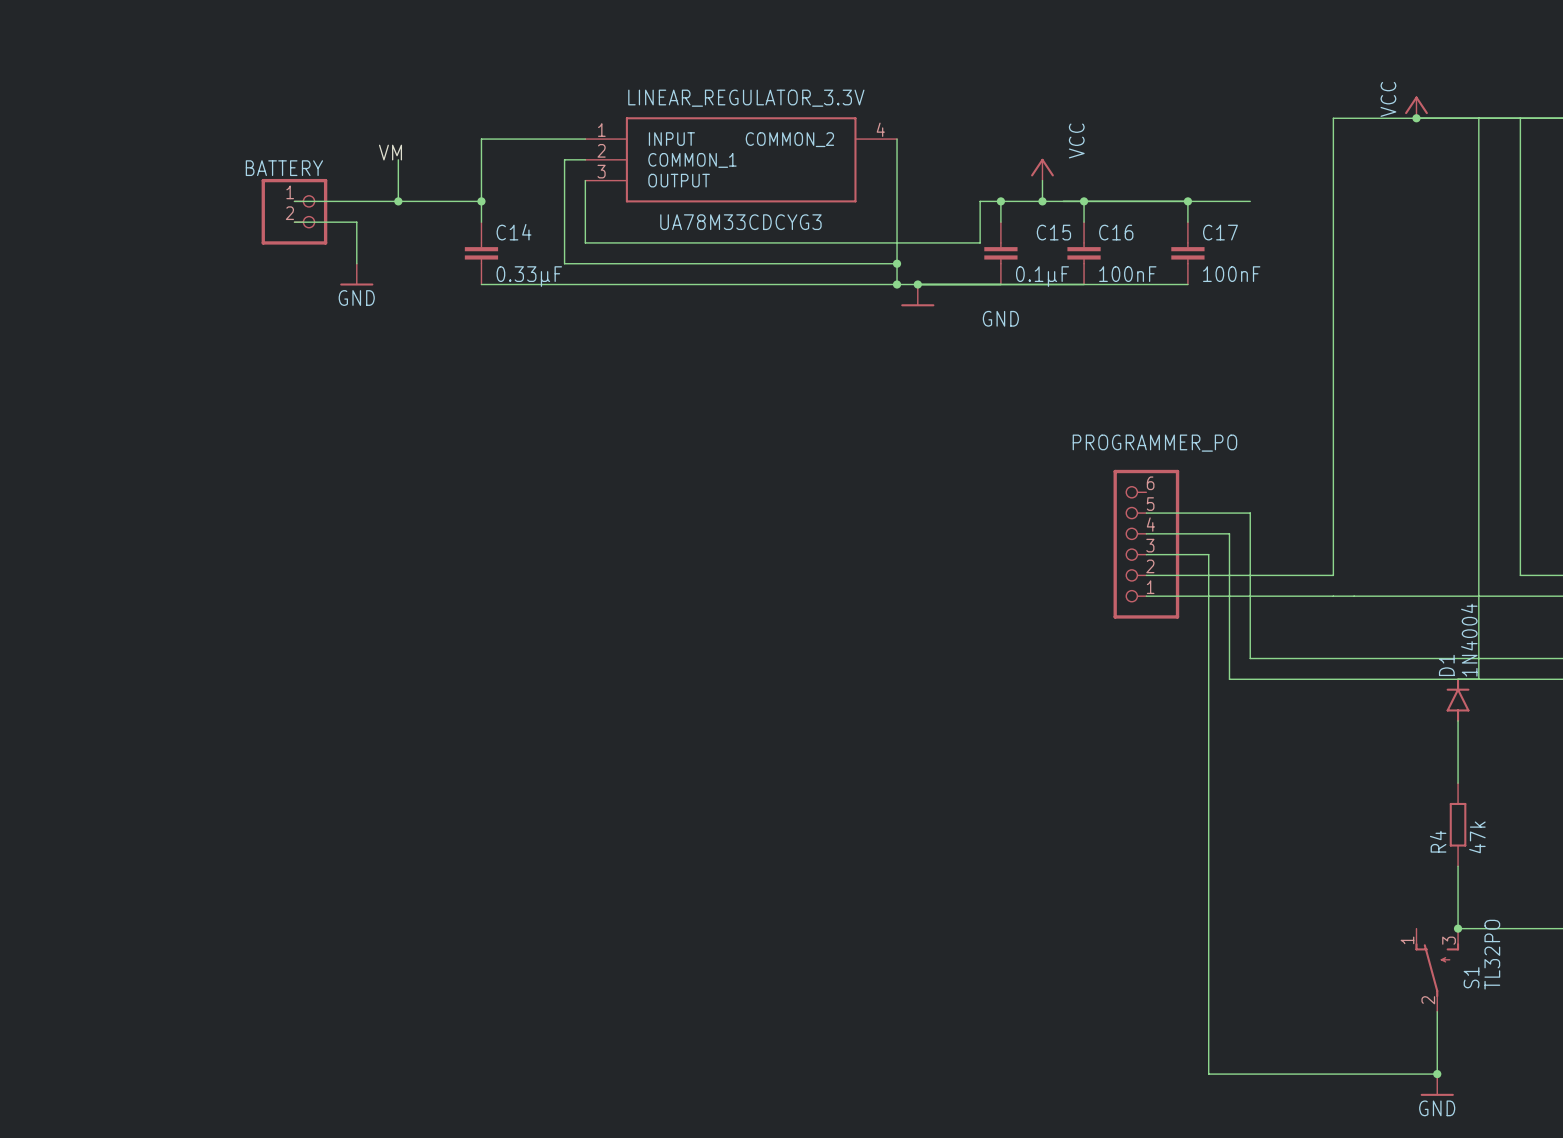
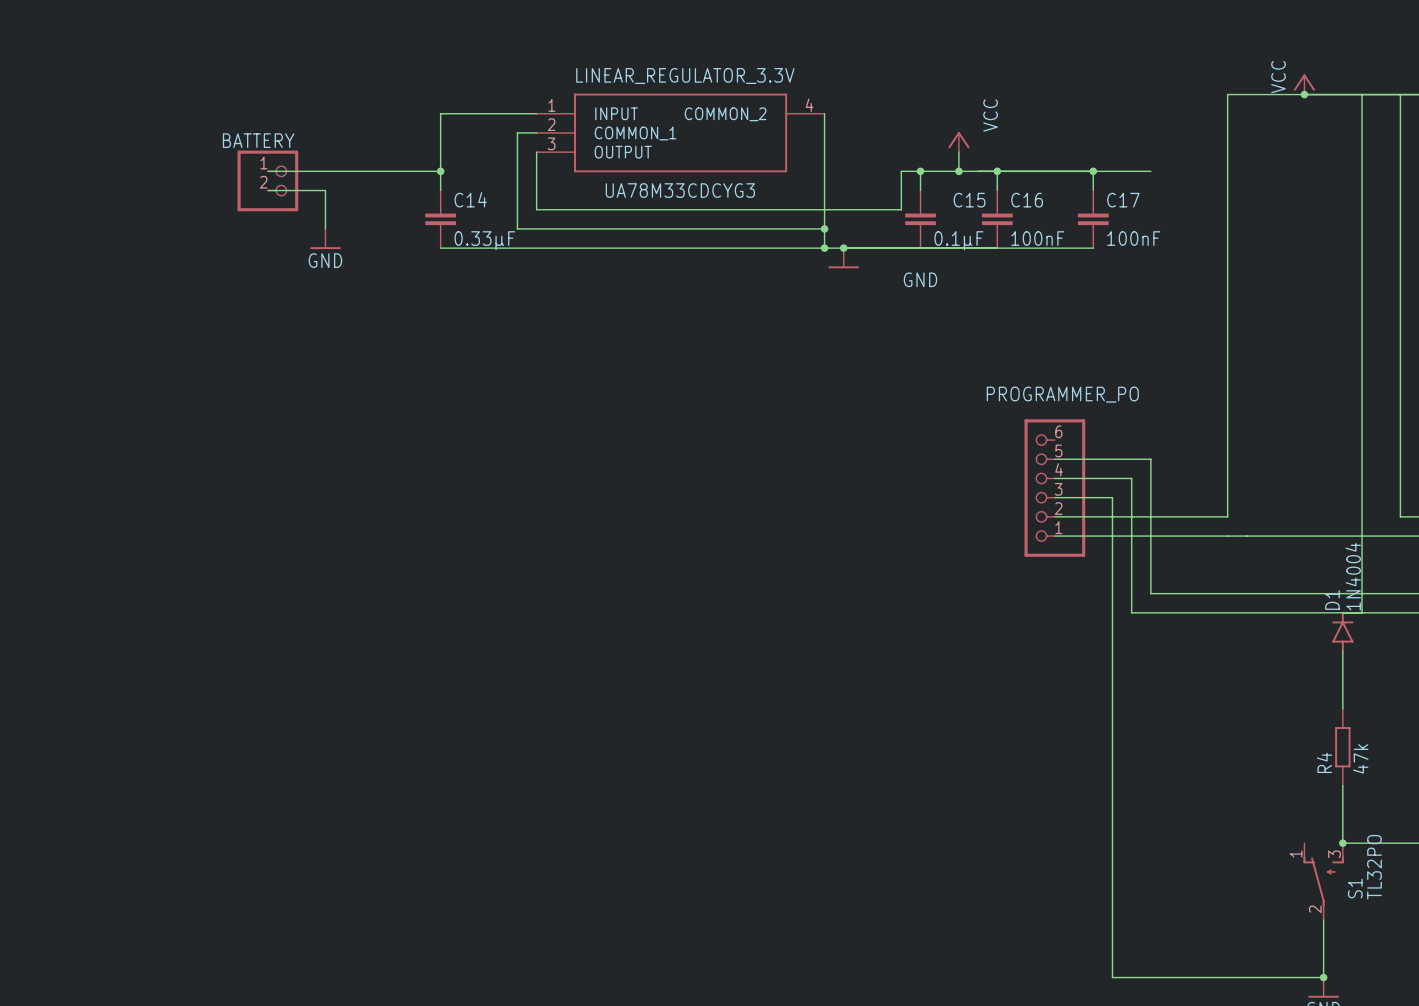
label: VM (390, 152) -> none
wire: (398, 159) (398, 201) -> none
junction: (398, 201) -> none

